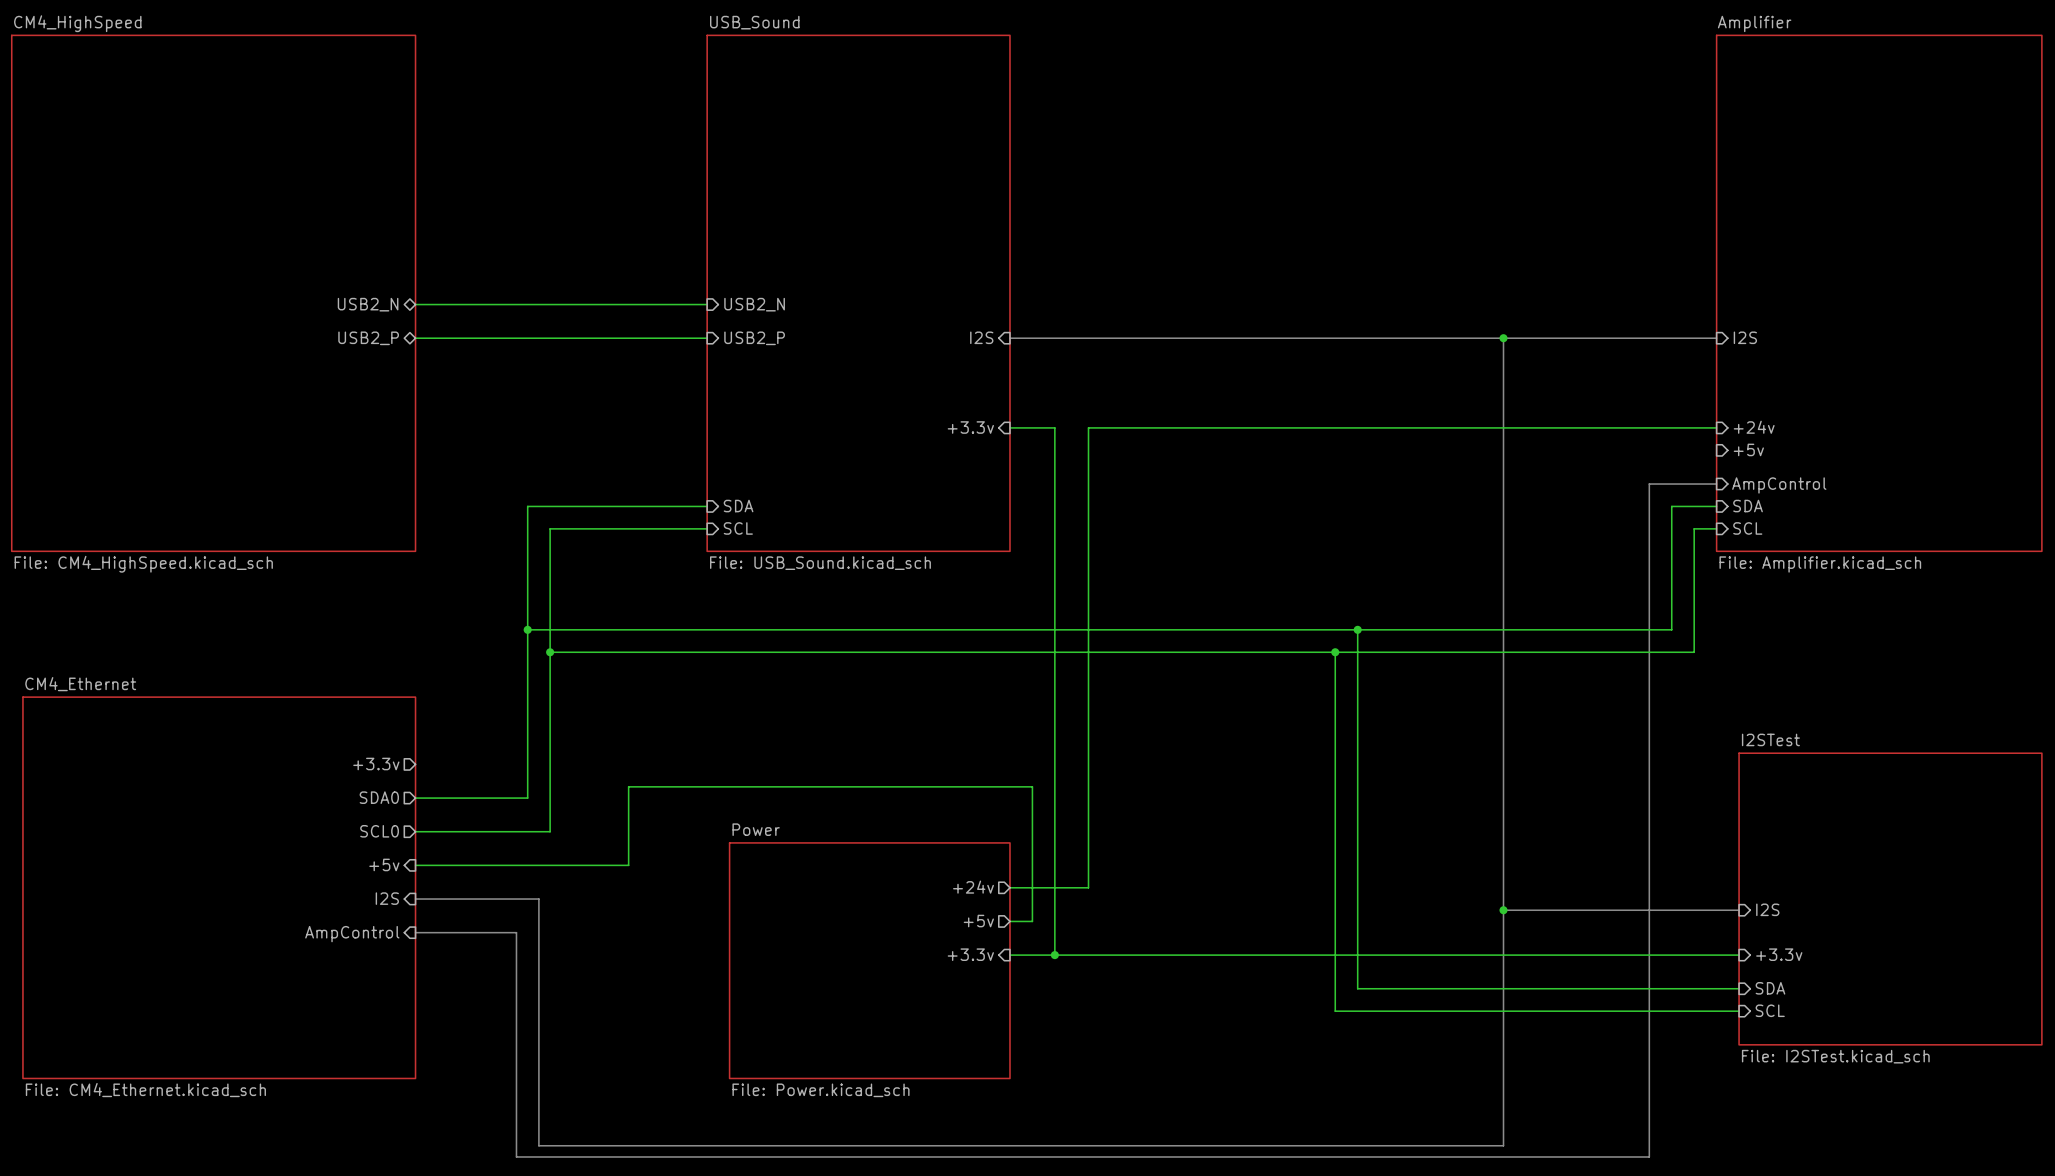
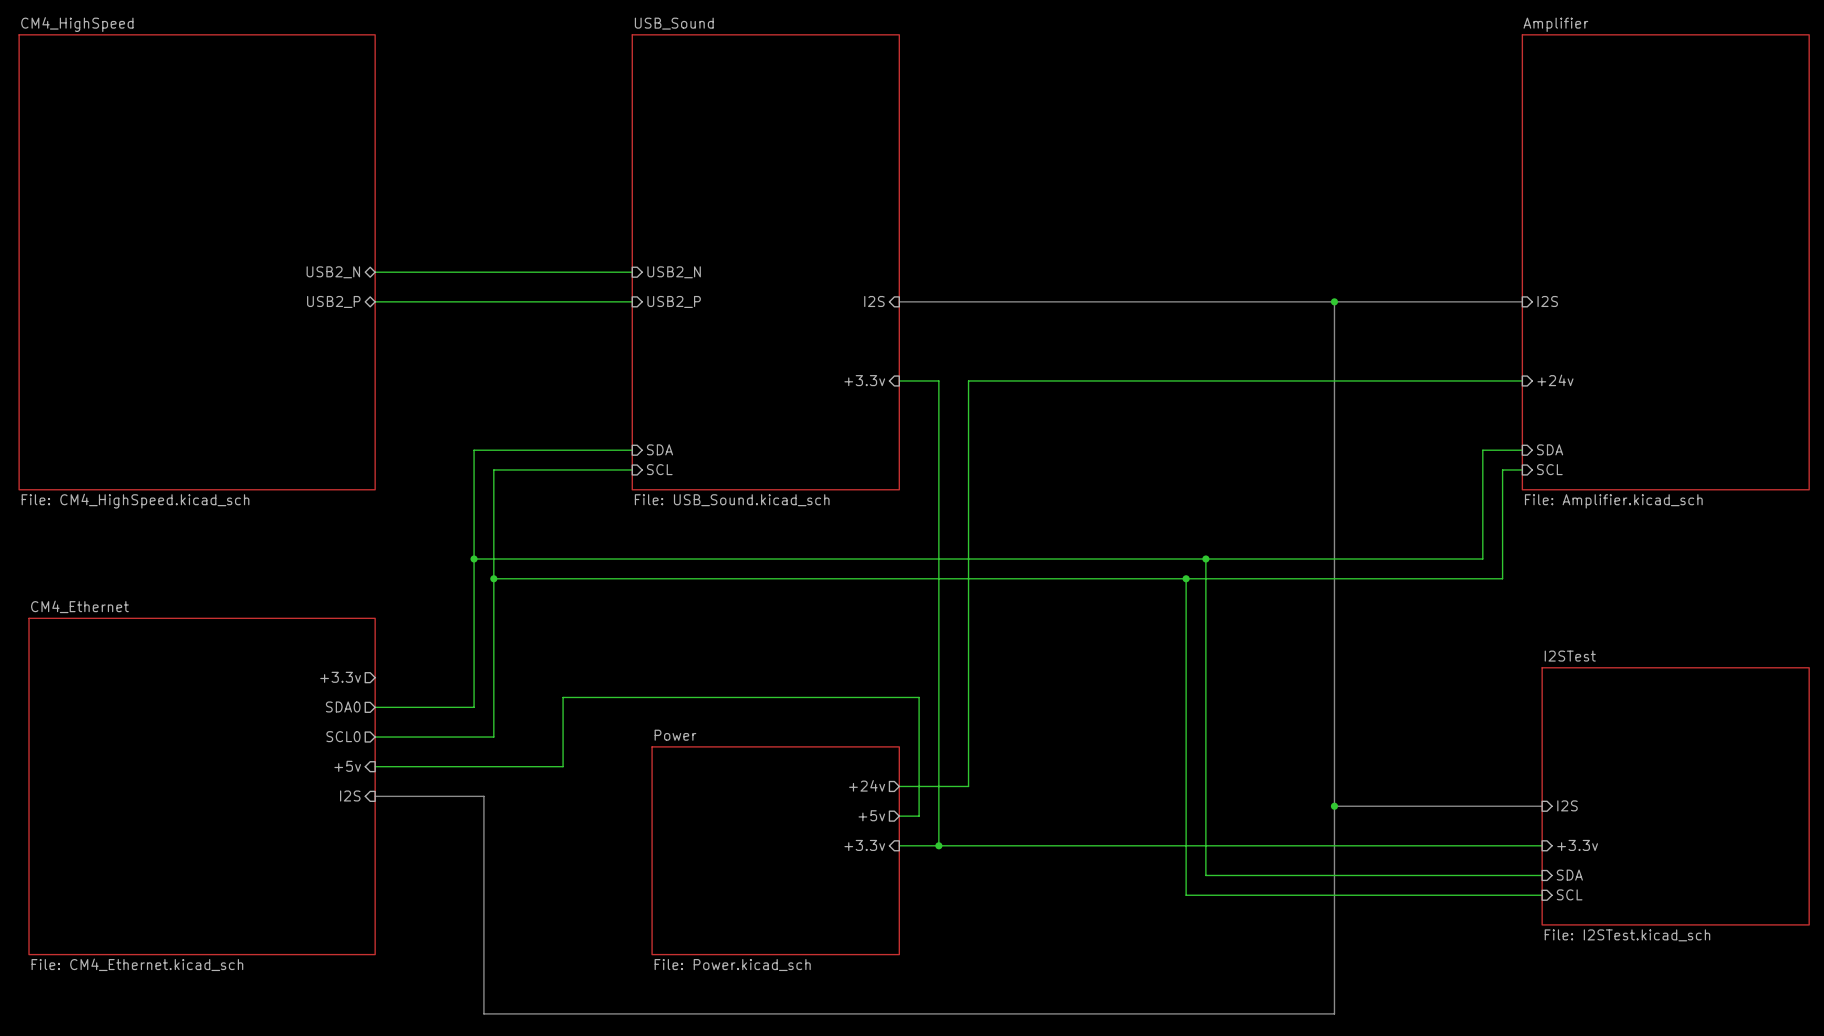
sheet pin: +5v (1748, 449) -> none
bus: (1716, 484) (1649, 484) (1649, 1156) (516, 1156) (516, 932) (415, 932) -> none
sheet pin: AmpControl (1779, 485) -> none
sheet pin: AmpControl (352, 934) -> none

